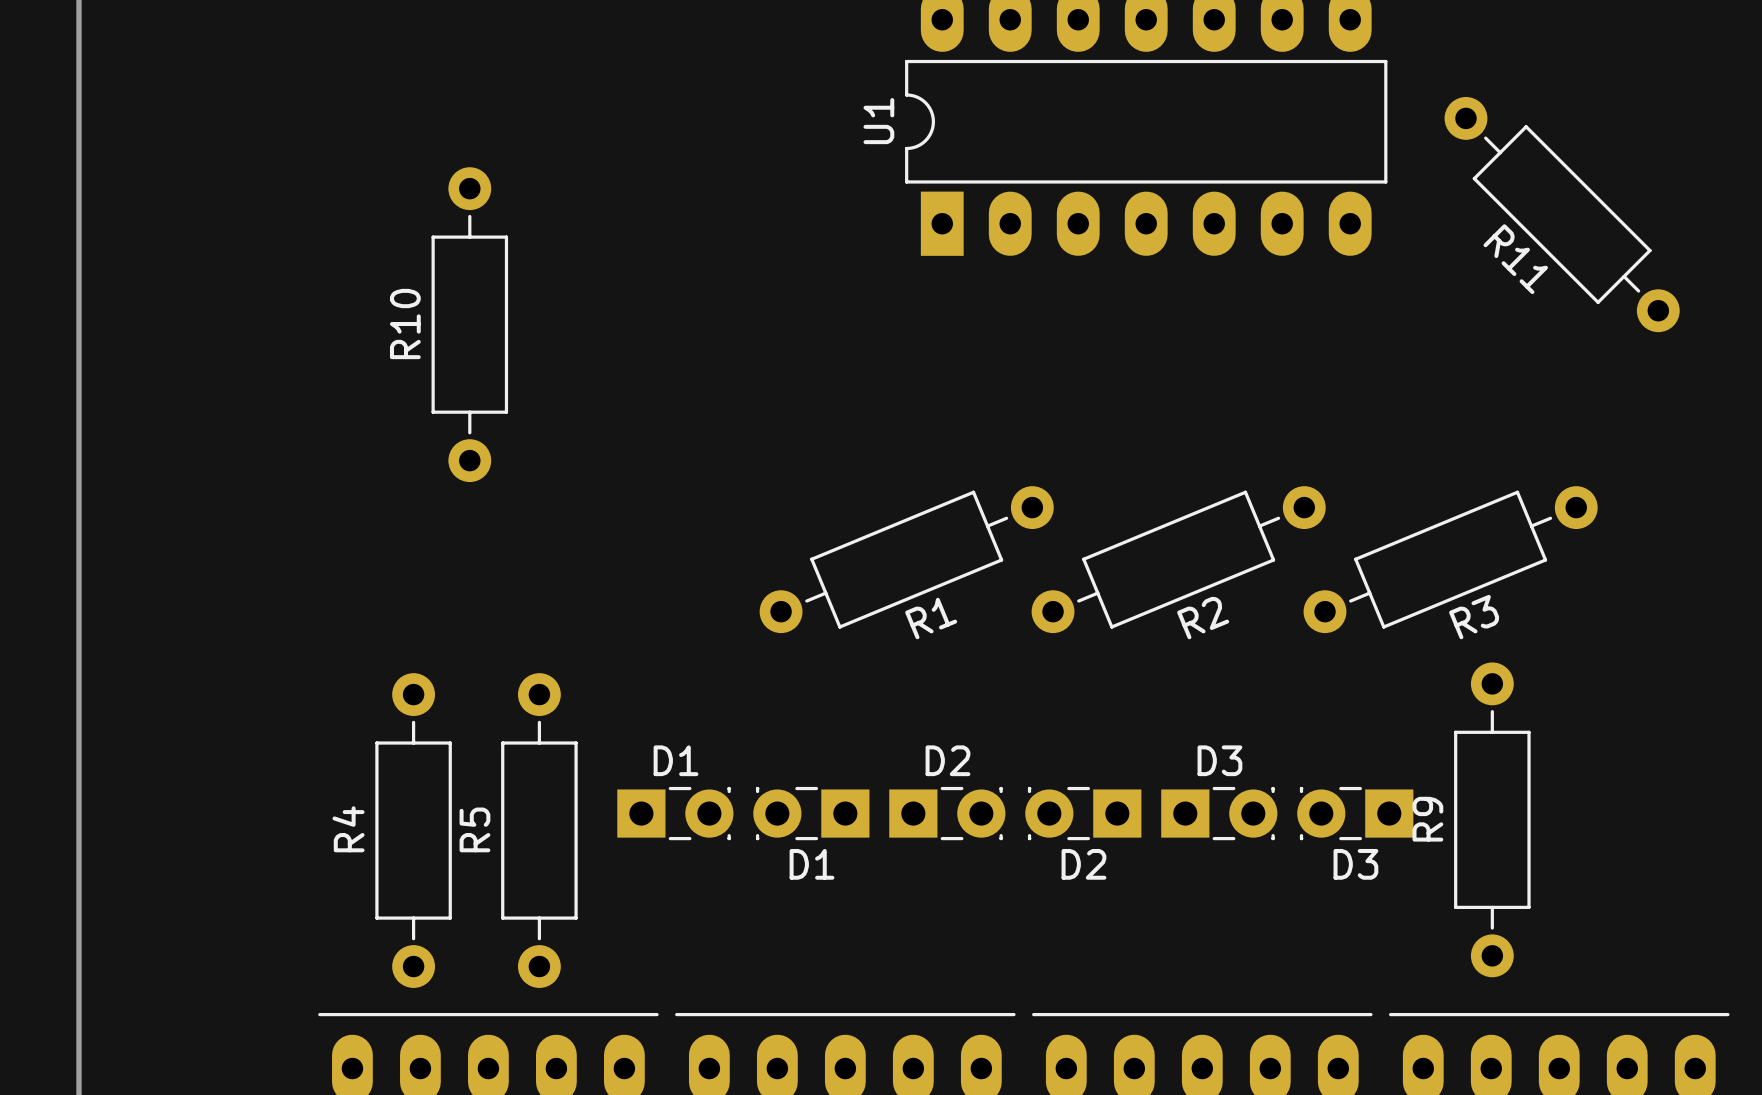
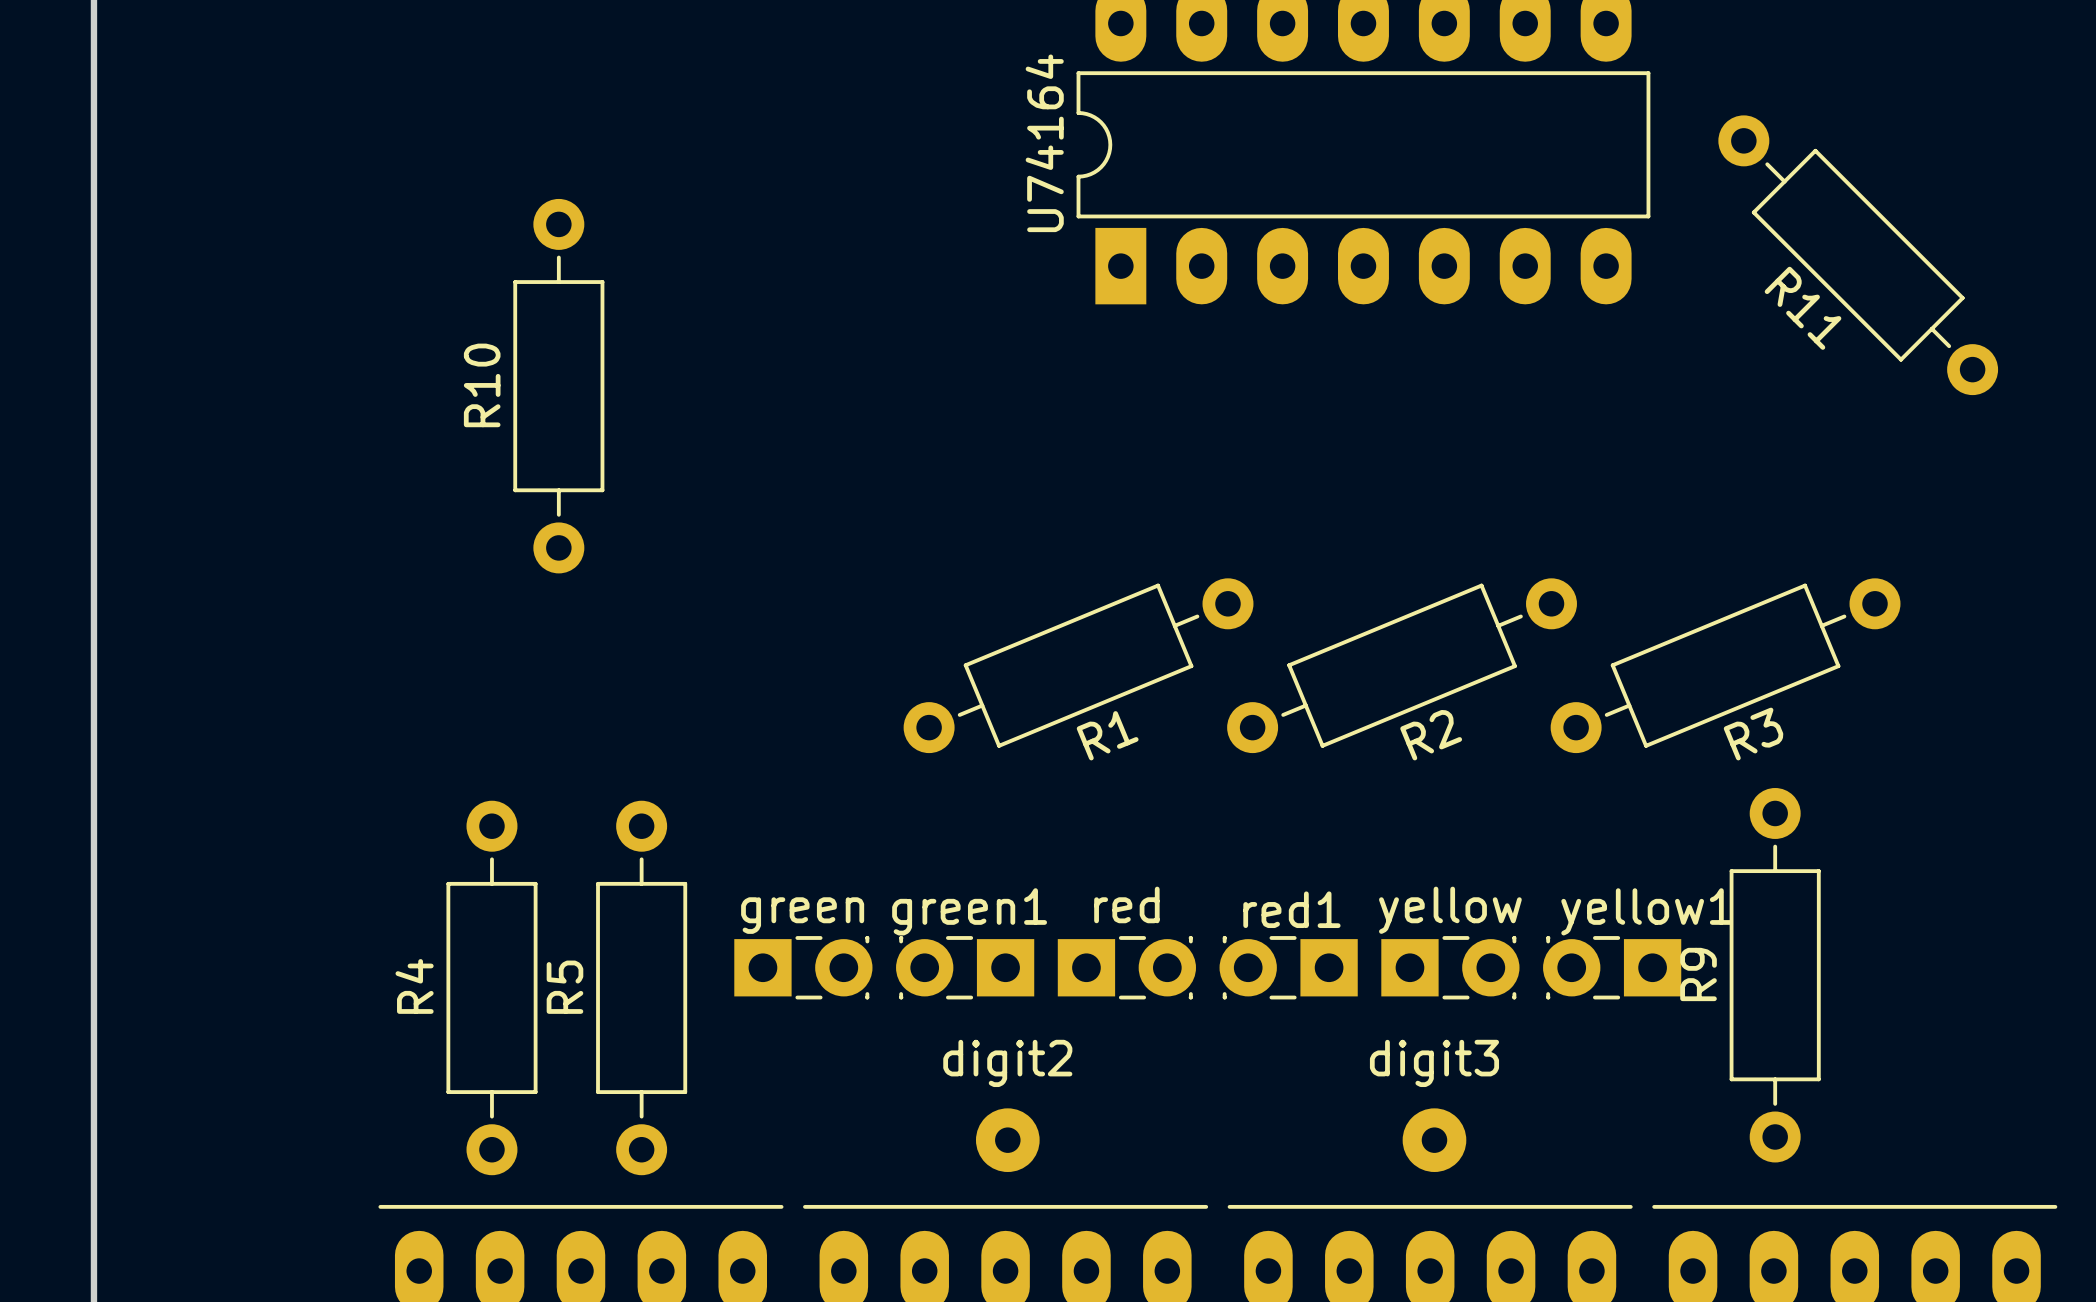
U1 name: U1 (878, 121) -> U74164 (1044, 143)
D1 name: D1 (676, 760) -> green (802, 915)
D2 name: D2 (947, 760) -> red (1126, 904)
D3 name: D3 (1219, 760) -> yellow (1450, 910)
D1 name: D1 (812, 864) -> green1 (969, 911)
D2 name: D2 (1083, 864) -> red1 (1291, 909)
D3 name: D3 (1355, 864) -> yellow1 (1647, 911)
digit2: none -> (1007, 1140)
digit3: none -> (1434, 1140)

